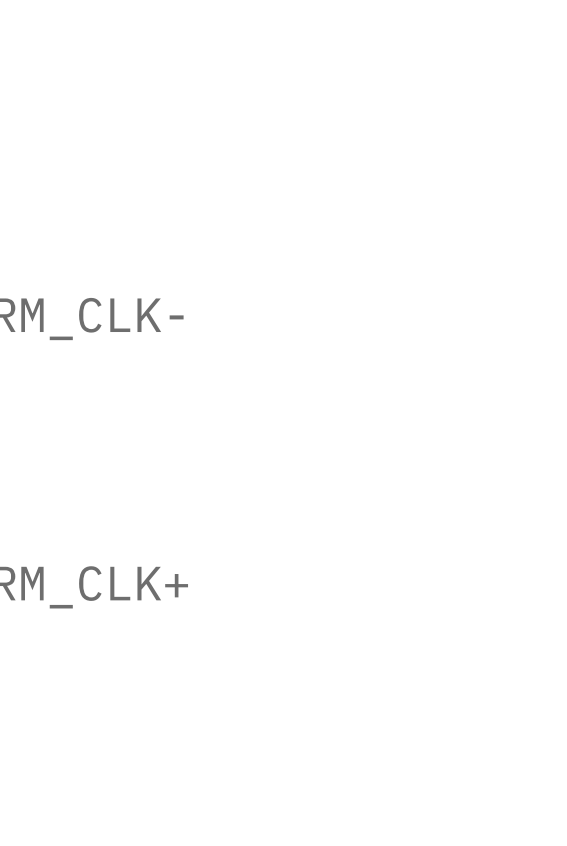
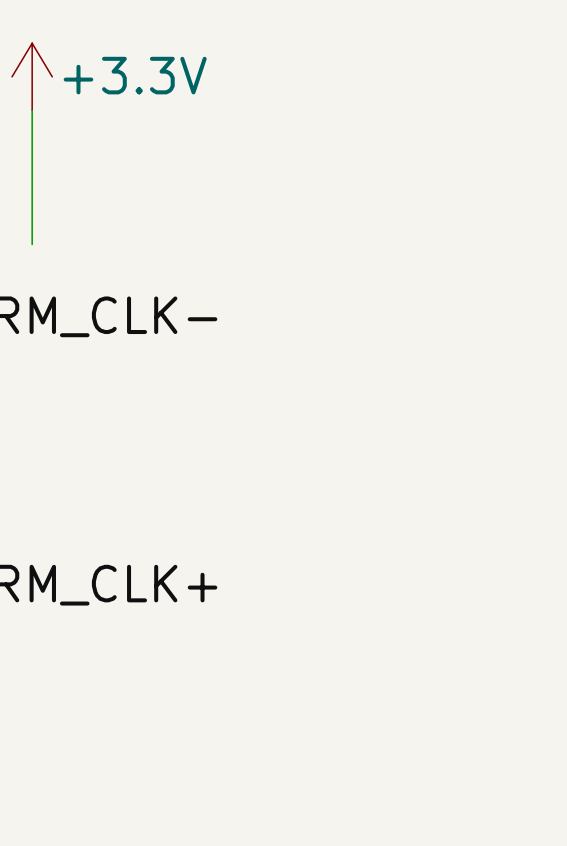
power symbol: none -> +3.3V (32, 76)
wire: none -> (32, 110) (32, 244)

